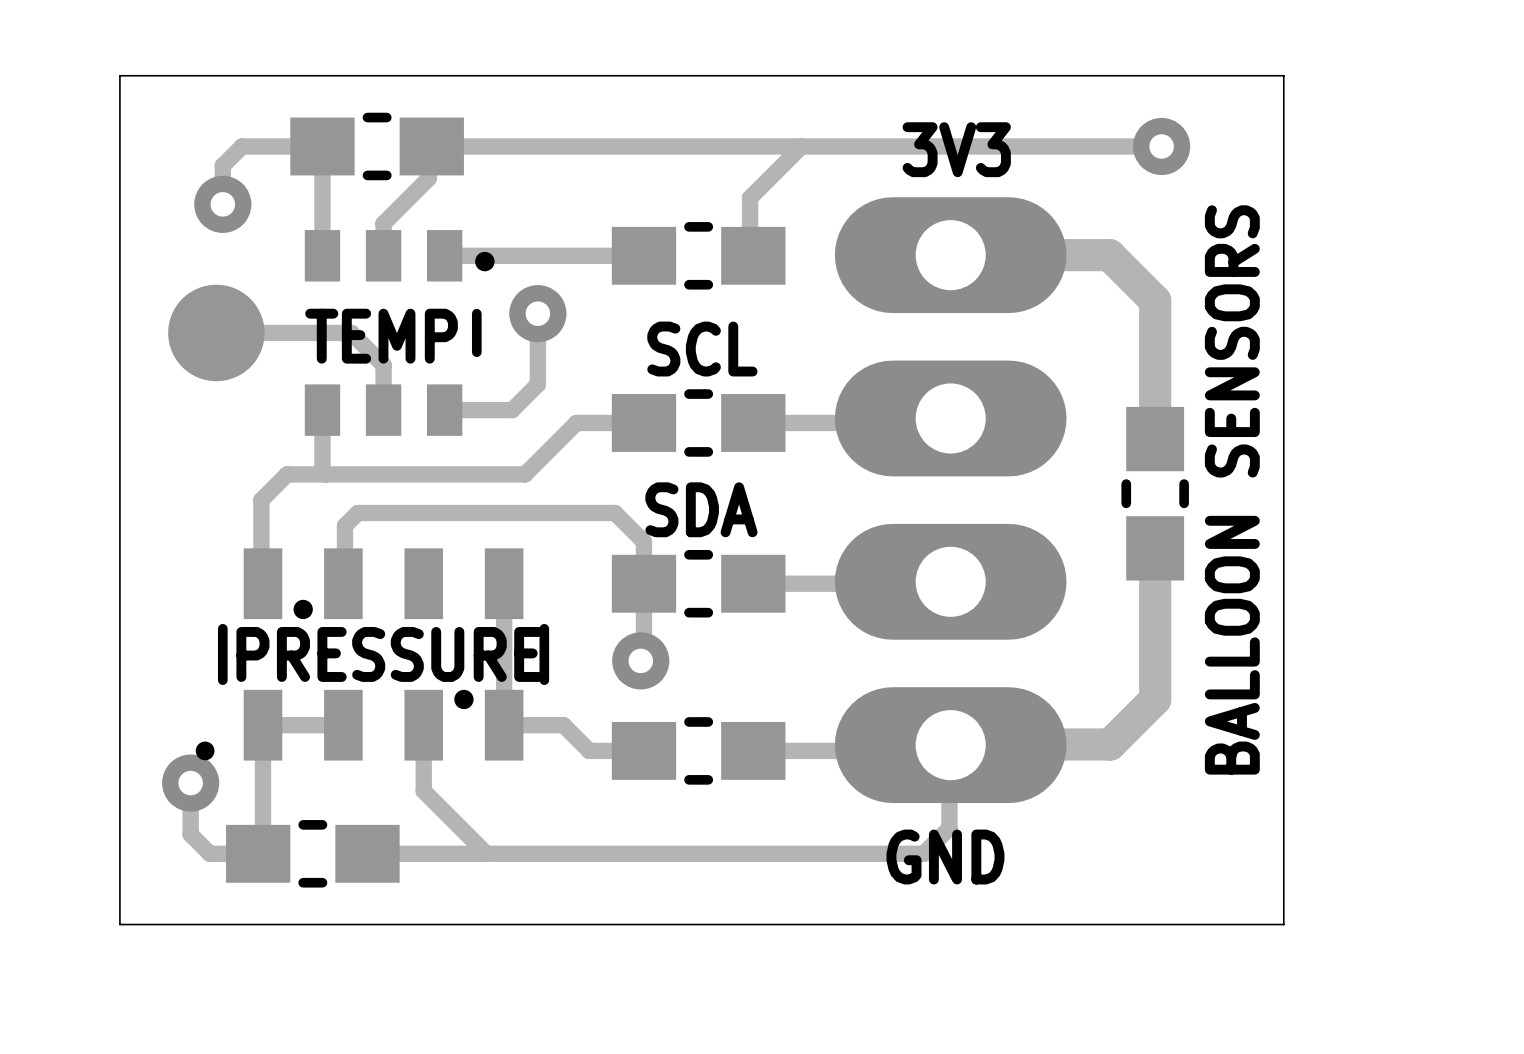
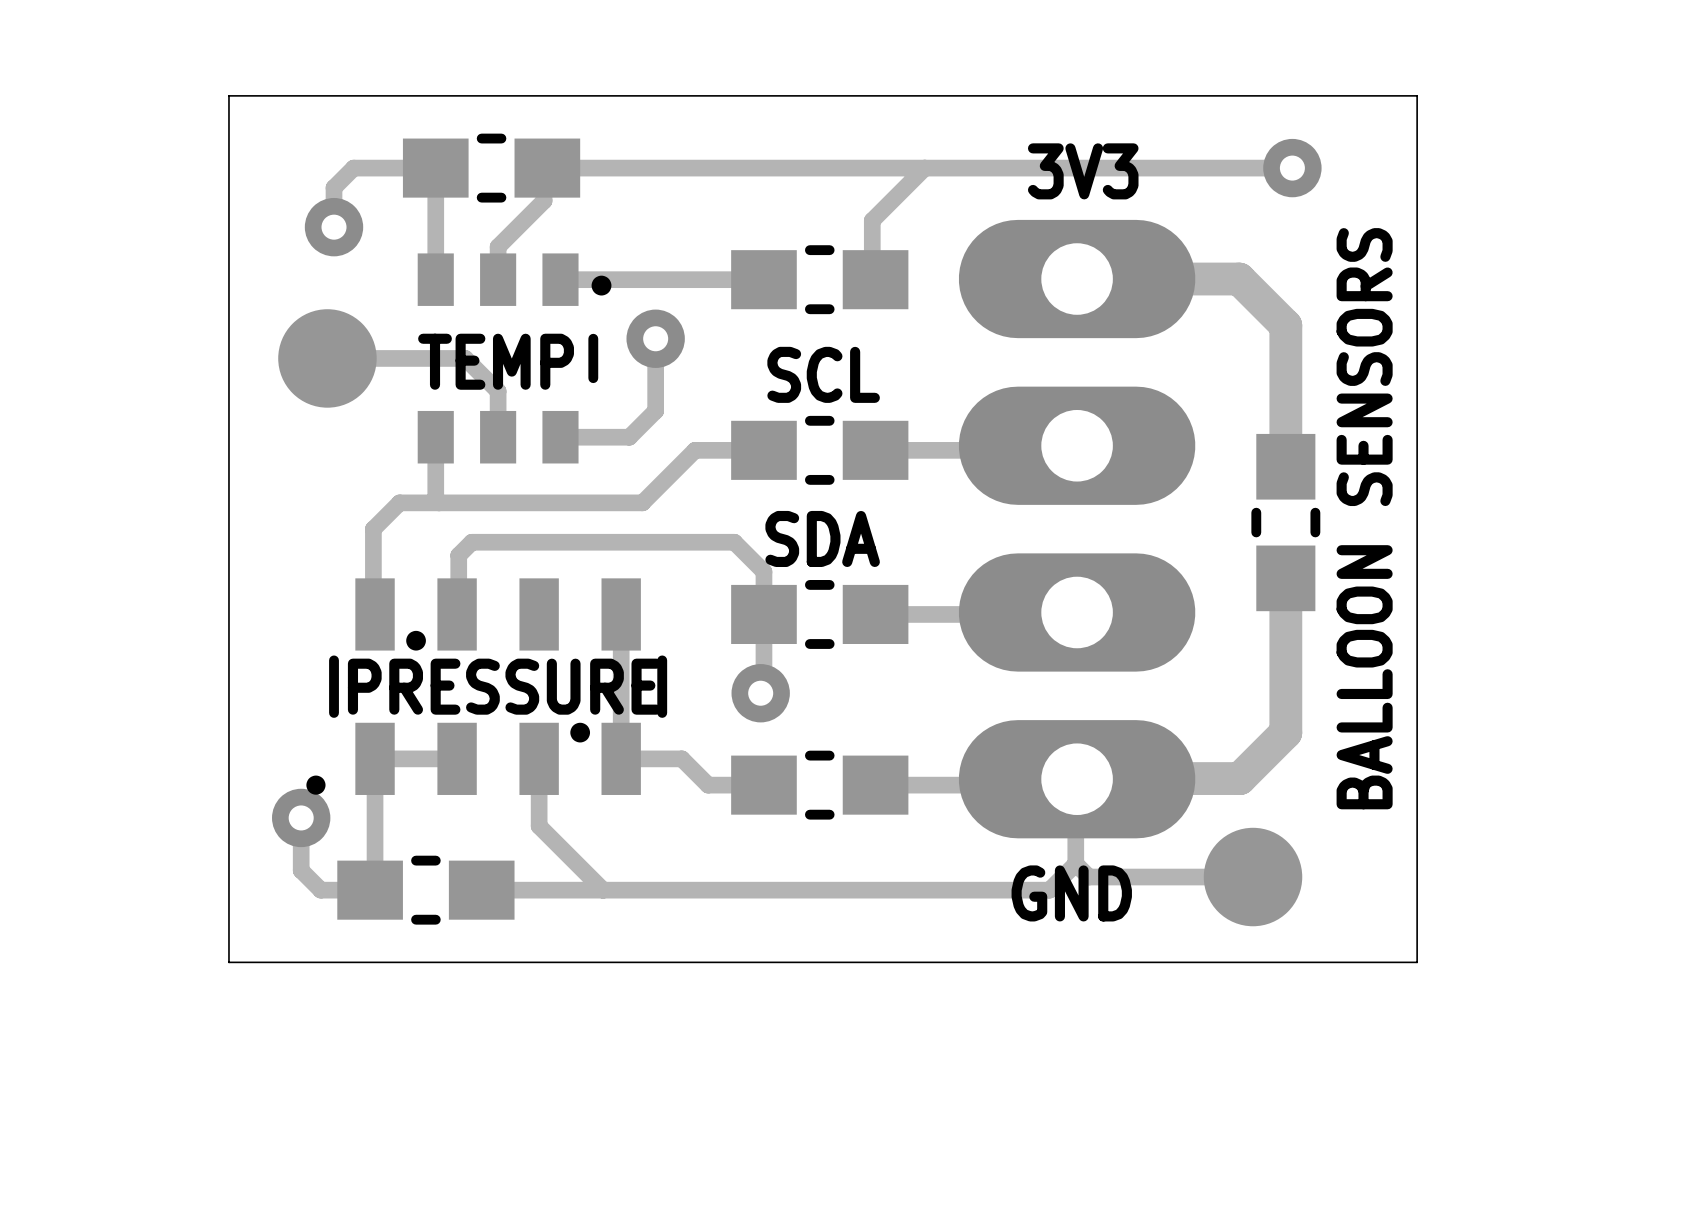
track: none -> (1075, 863) (1088, 877) (1253, 877)
part: none -> (1253, 877)

